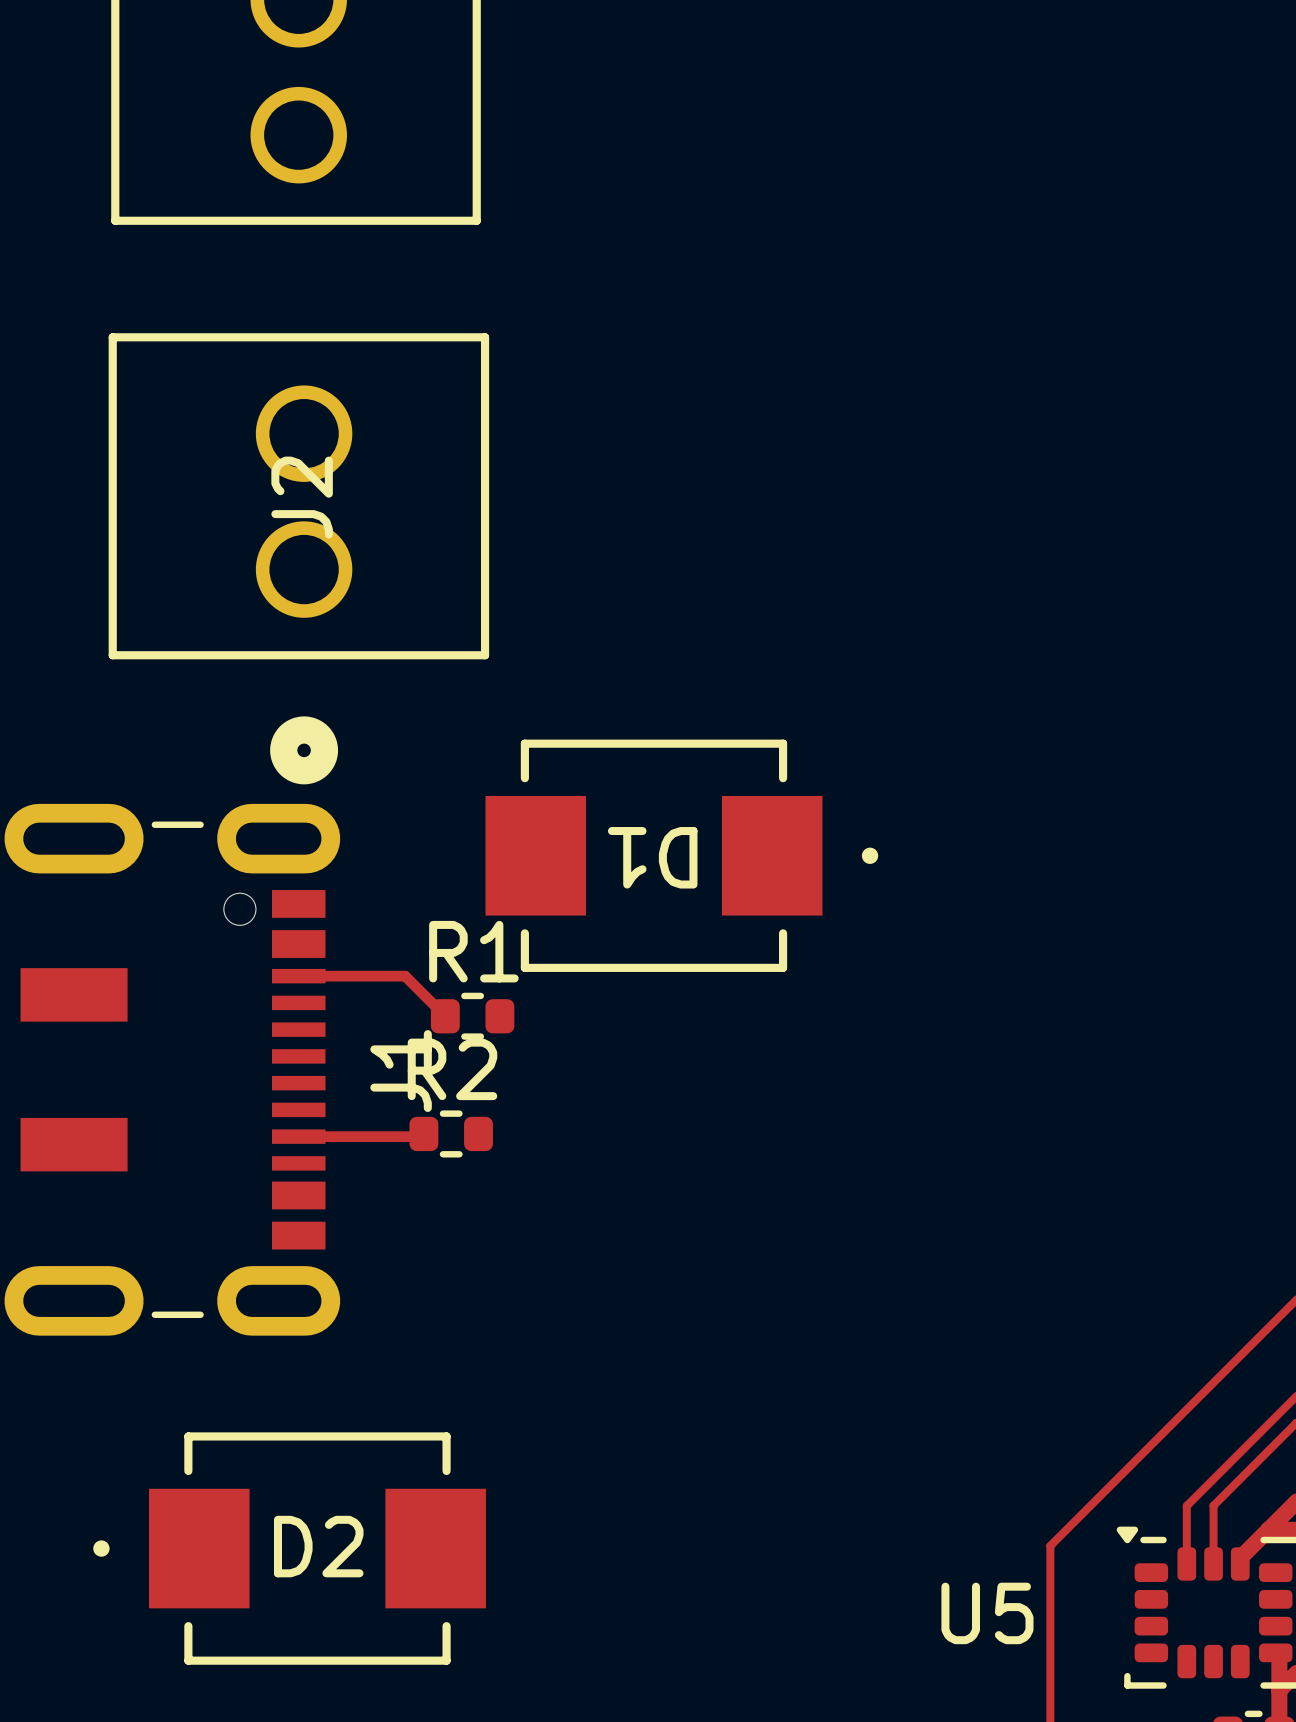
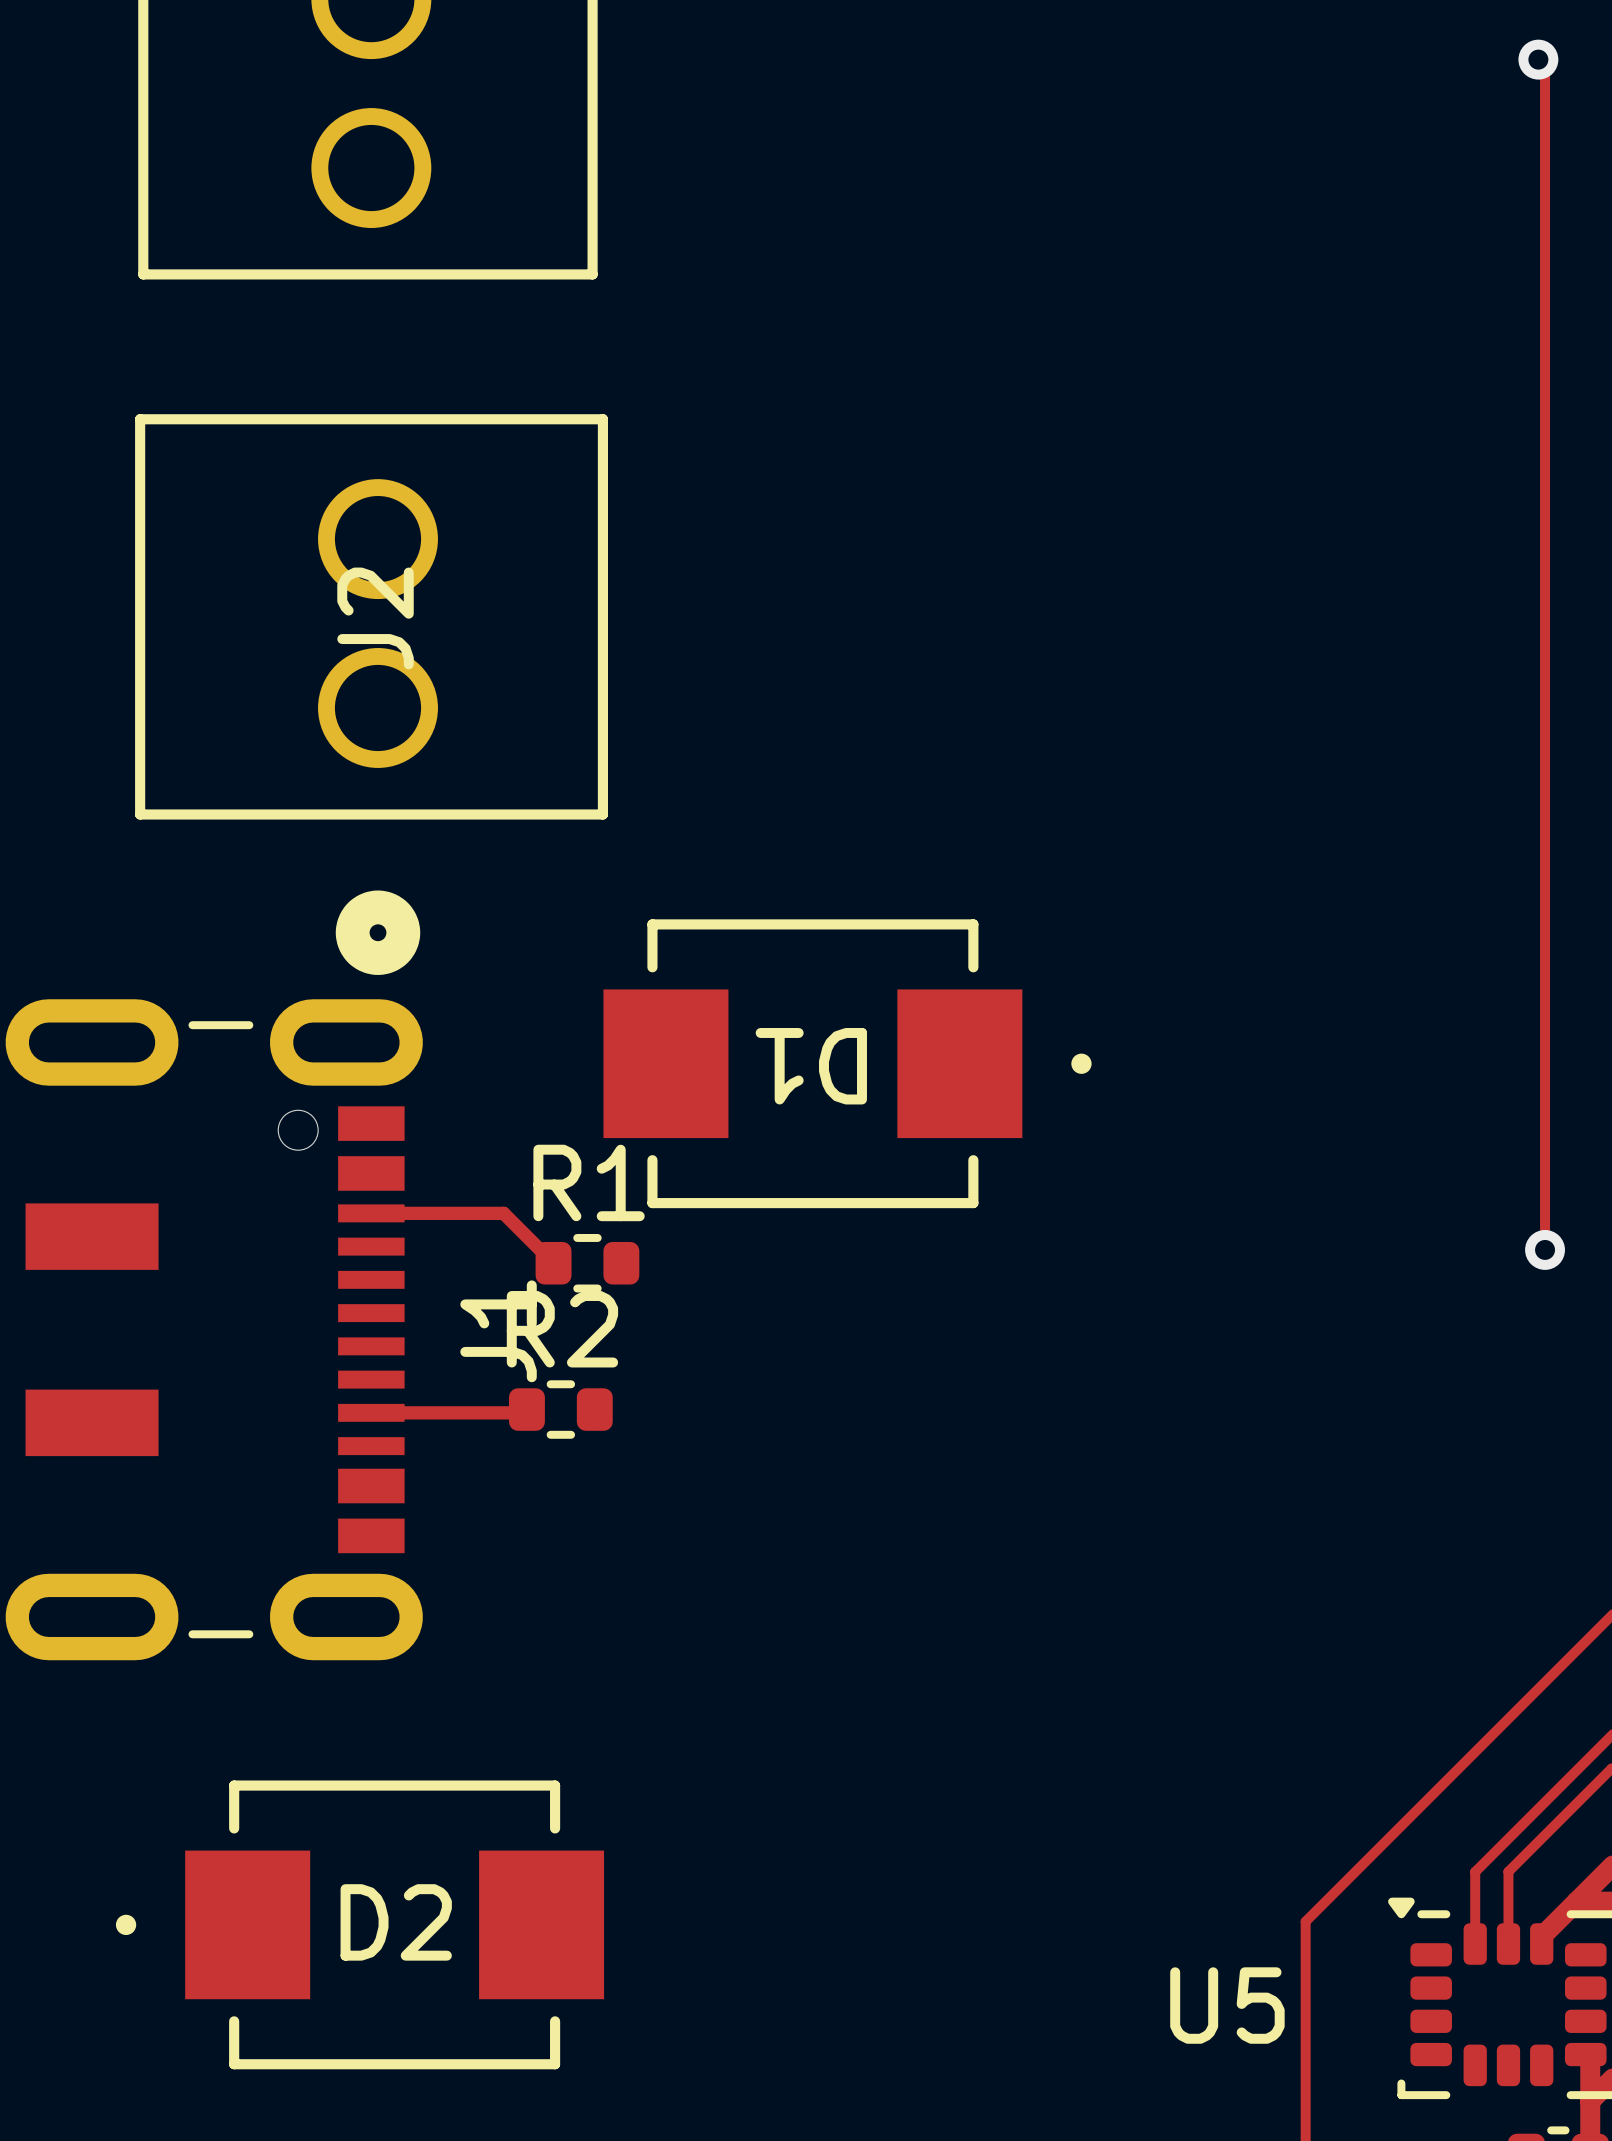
track: none -> (1538, 59) (1545, 66) (1545, 1249)
via: none -> (1538, 59)
via: none -> (1545, 1249)

